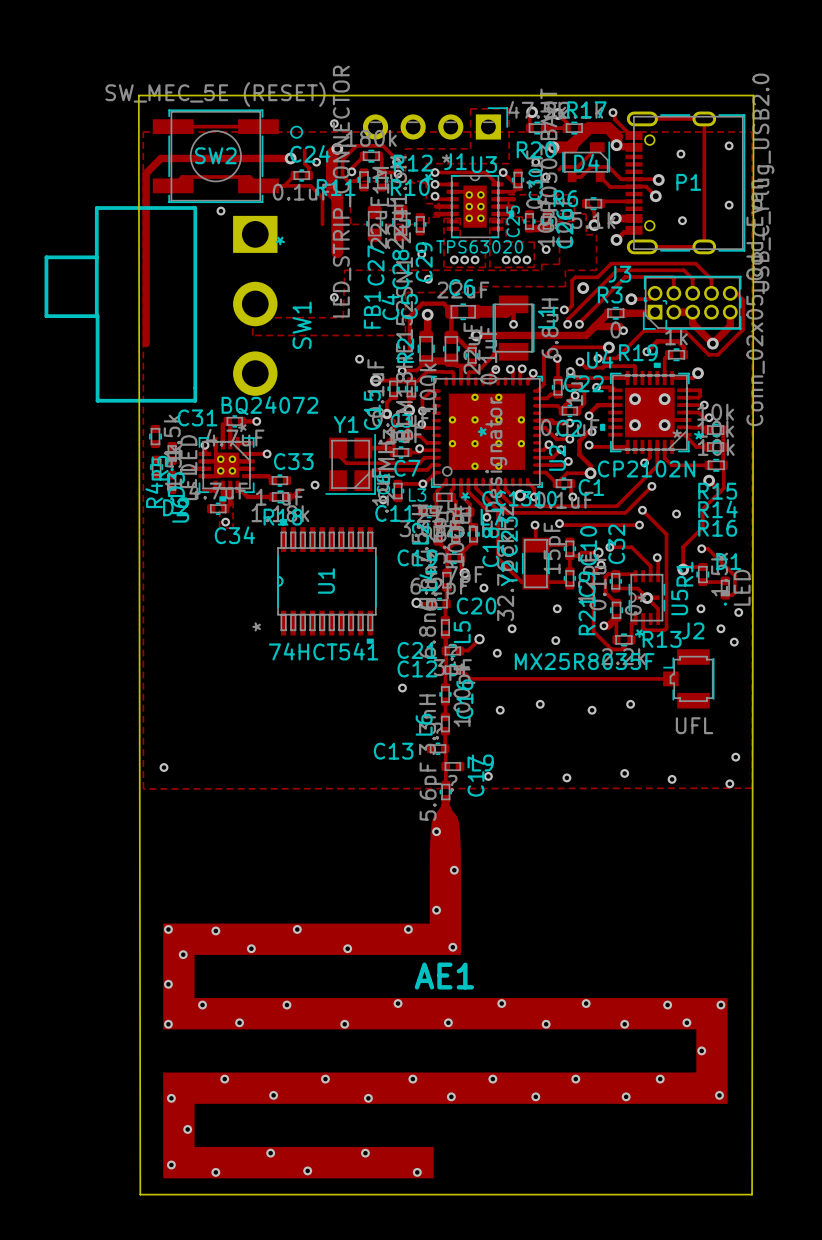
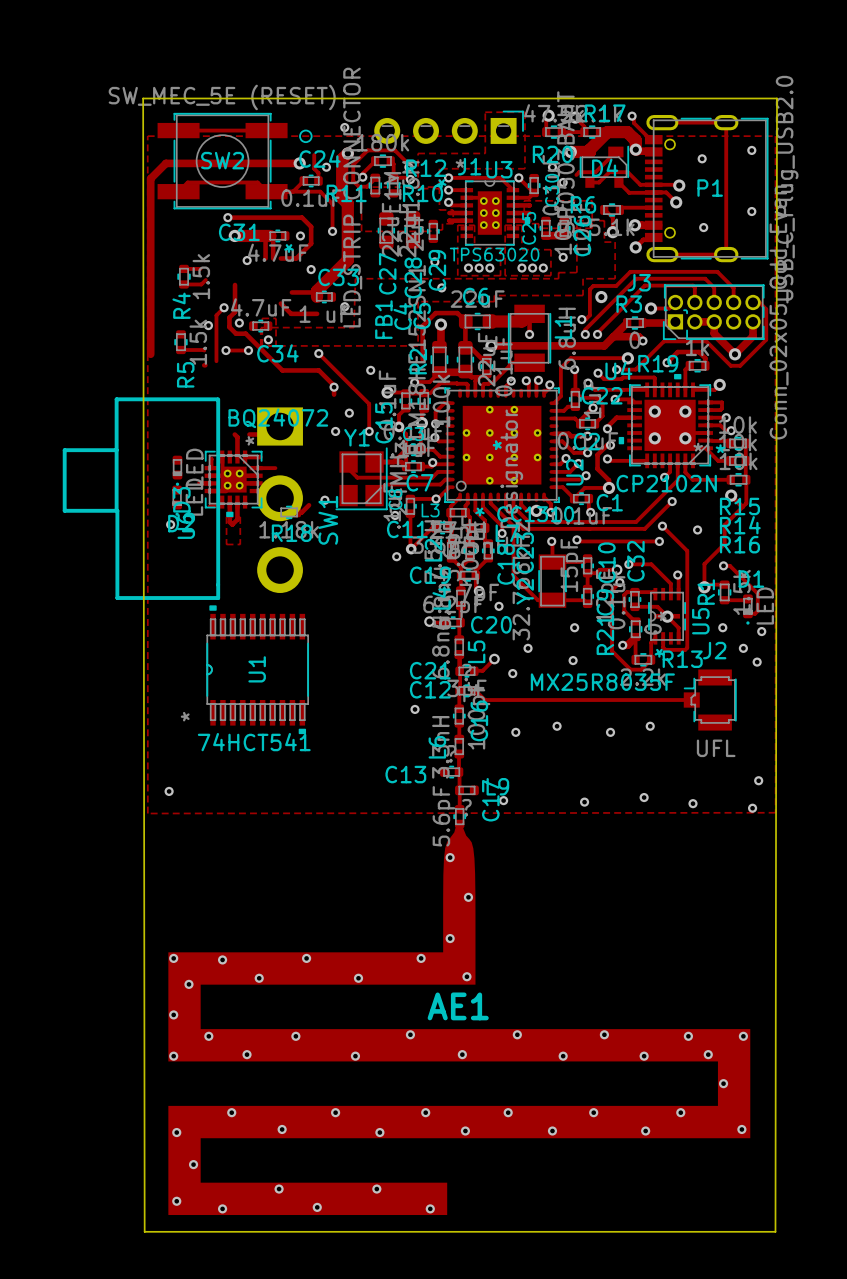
track: none -> (227, 217) (301, 217) (311, 226) (311, 243) (296, 258) (280, 258)
via: none -> (332, 231)
via: none -> (234, 235)
track: none -> (237, 235) (270, 235) (273, 238) (273, 258)
via: none -> (300, 235)
via: none -> (247, 260)
track: none -> (347, 260) (317, 290) (317, 296) (312, 292) (291, 292)
track: none -> (184, 268) (200, 268)
via: none -> (311, 269)
track: none -> (205, 280) (201, 284) (184, 284)
track: none -> (235, 284) (235, 312) (229, 317) (229, 327) (236, 333) (245, 333) (282, 370) (318, 370) (334, 385) (334, 394)
track: none -> (224, 307) (216, 315) (216, 361)
via: none -> (224, 307)
SW1 position: (161, 304) -> (182, 498)
via: none -> (239, 323)
via: none -> (208, 325)
via: none -> (268, 339)
zone outline: none -> (262, 345) (262, 318) (276, 318) (276, 345)
track: none -> (180, 350) (204, 350)
track: none -> (226, 350) (248, 350)
via: none -> (226, 350)
via: none -> (248, 350)
track: none -> (318, 353) (369, 403) (369, 431)
via: none -> (318, 353)
track: none -> (204, 365) (205, 365)
via: none -> (334, 387)
via: none -> (349, 413)
via: none -> (335, 431)
via: none -> (369, 431)
C31 position: (234, 421) -> (277, 235)
via: (256, 421) -> none
track: (222, 424) (222, 443) -> (265, 238) (265, 258)
R5 position: (155, 436) -> (180, 342)
via: (205, 445) -> none
via: (267, 453) -> none
R4 position: (156, 467) -> (184, 276)
track: (248, 476) (268, 476) (272, 480) -> none
C33 position: (279, 480) -> (324, 296)
track: (237, 486) (247, 496) (272, 496) -> (280, 303) (291, 313) (317, 313)
track: none -> (410, 513) (411, 549) (432, 527)
via: none -> (170, 524)
C34 position: (218, 508) -> (260, 326)
via: (225, 522) -> none
via: none -> (411, 549)
via: none -> (396, 556)
U1 position: (326, 581) -> (257, 669)

